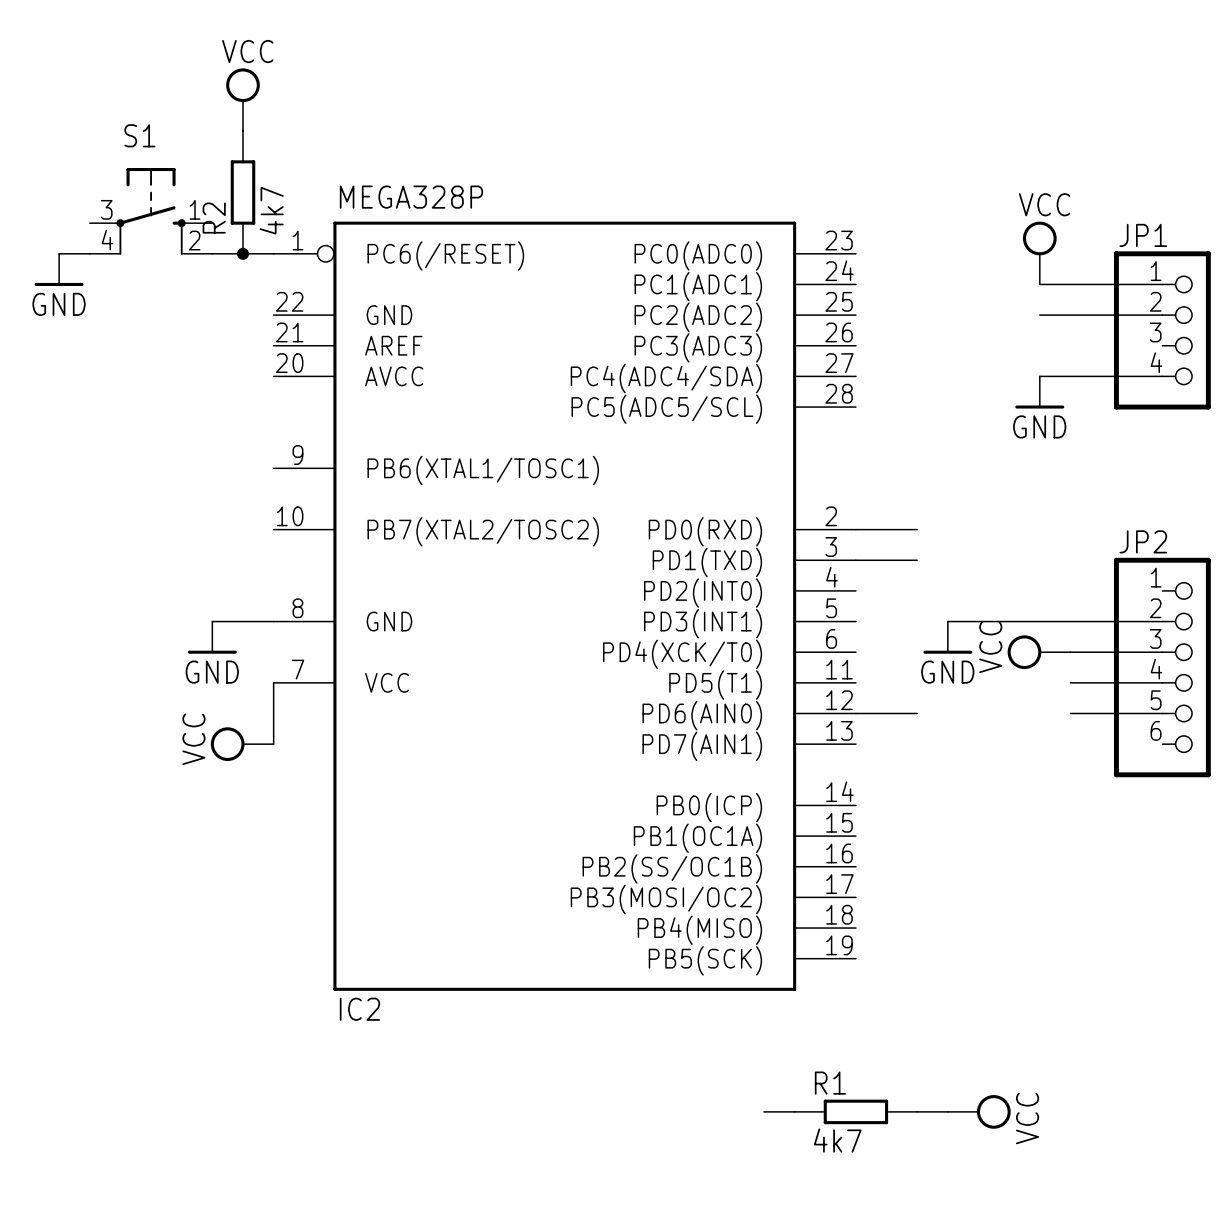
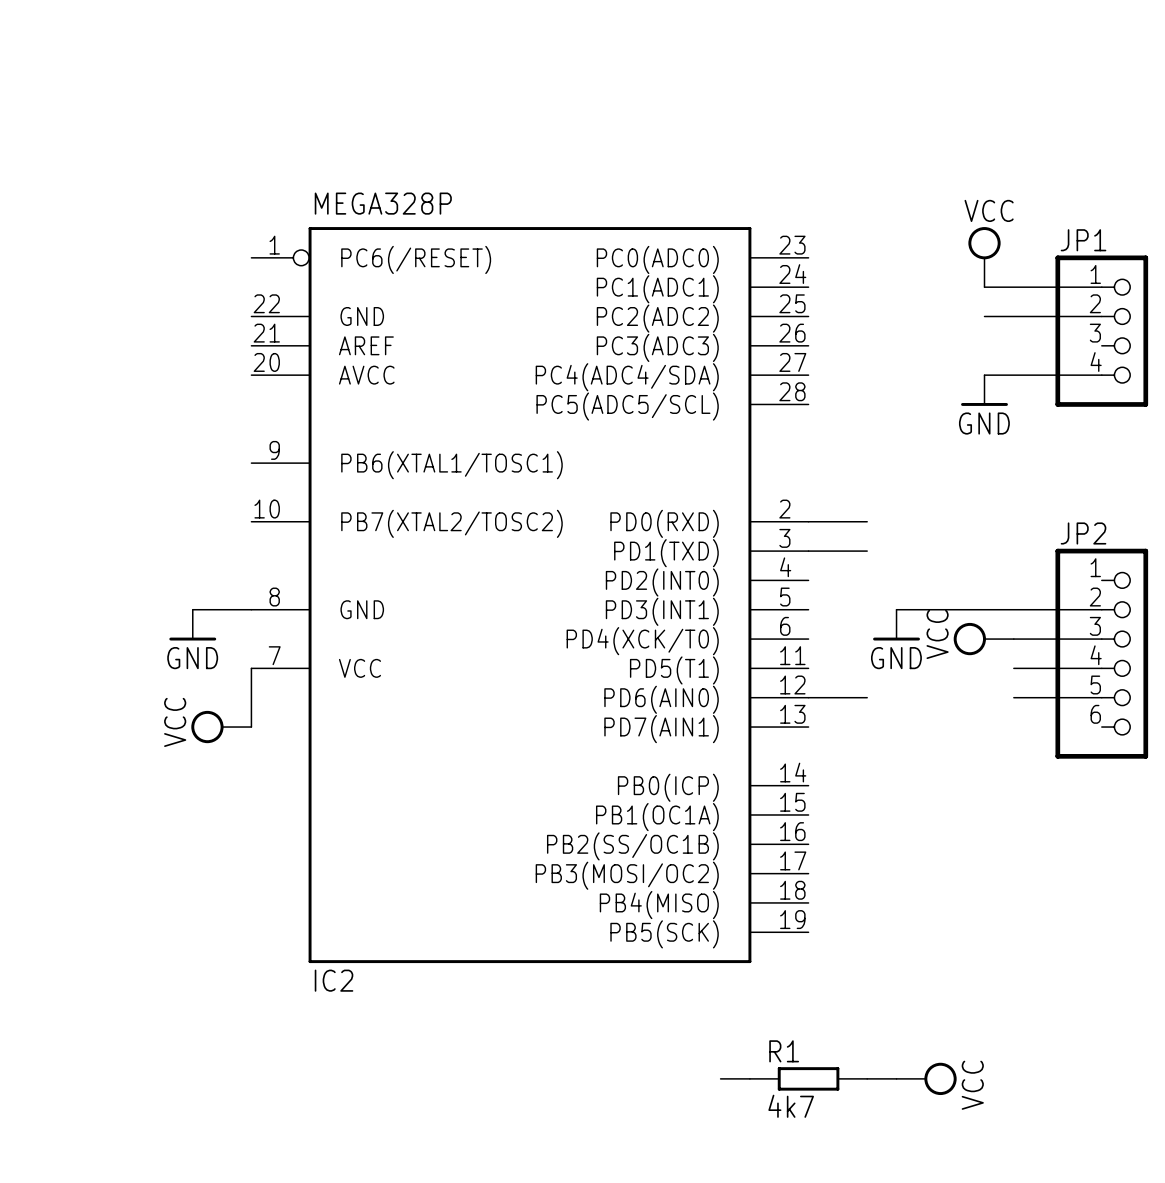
power symbol: VCC (242, 99) -> none
R2: 4k7 (242, 192) -> none
S1: (151, 211) -> none
wire: (59, 253) (89, 253) -> none
wire: (212, 253) (273, 253) -> none
junction: (242, 253) -> none
power symbol: GND (59, 269) -> none

